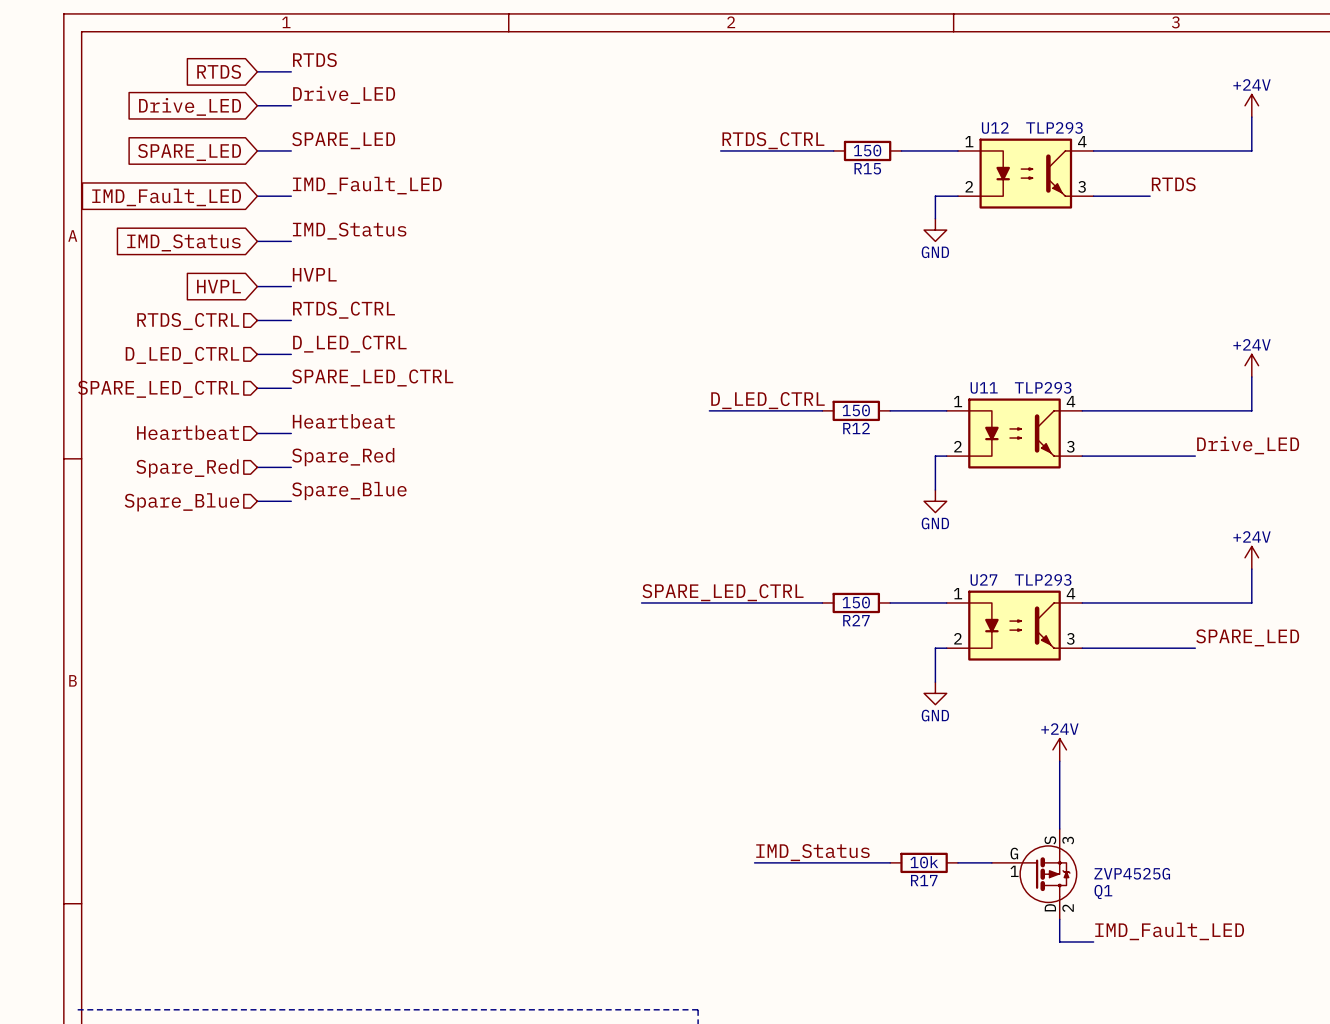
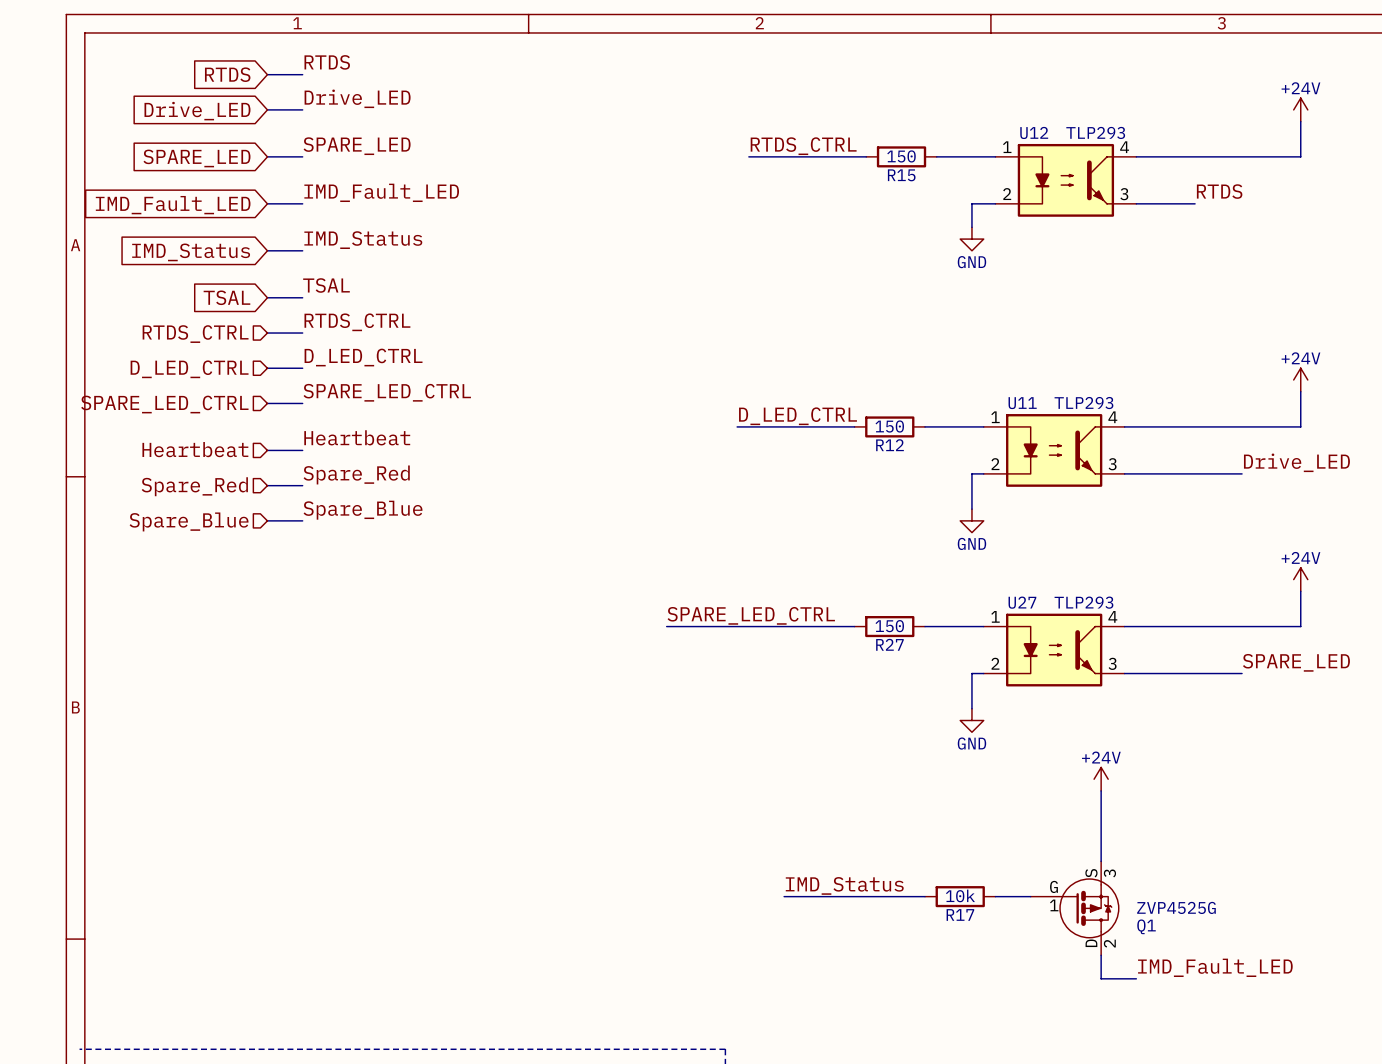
label: HVPL (314, 274) -> TSAL (326, 285)
global label: HVPL (218, 286) -> TSAL (226, 297)

